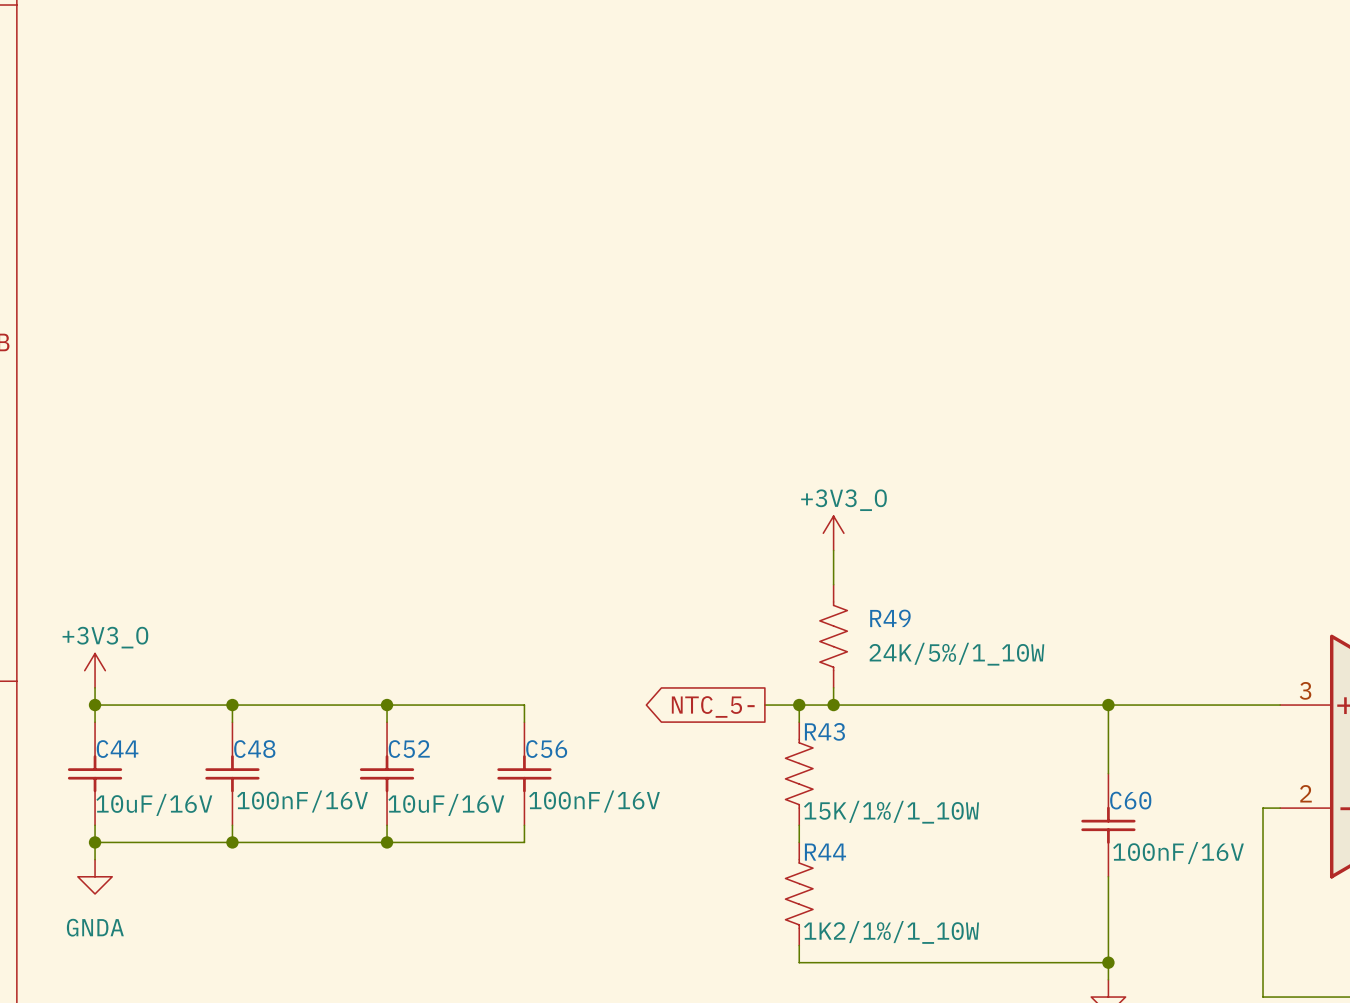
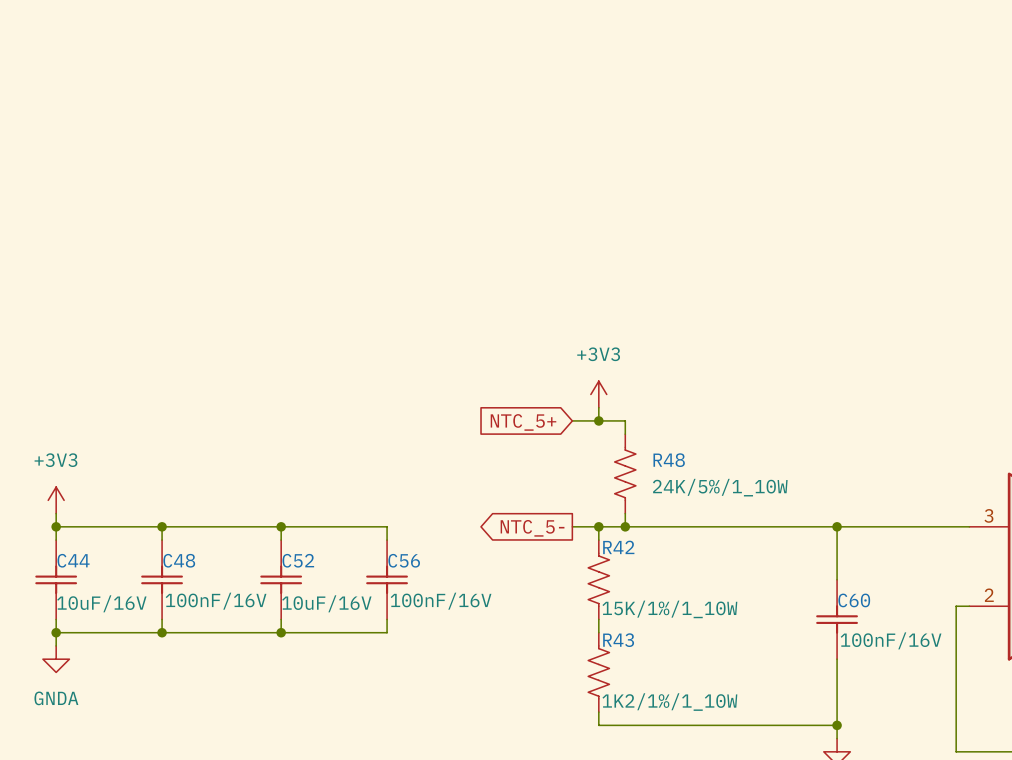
power symbol: none -> +3V3 (598, 394)
power symbol: +3V3_O (833, 533) -> none
wire: none -> (598, 407) (598, 420)
wire: (833, 550) (833, 567) -> (572, 420) (625, 420)
junction: none -> (598, 420)
global label: none -> NTC_5+ (523, 422)
R49 name: R49 (890, 618) -> R48 (669, 460)
power symbol: +3V3_O (95, 670) -> +3V3 (56, 500)
R43 name: R43 (824, 731) -> R42 (618, 547)
R44 name: R44 (825, 852) -> R43 (618, 640)

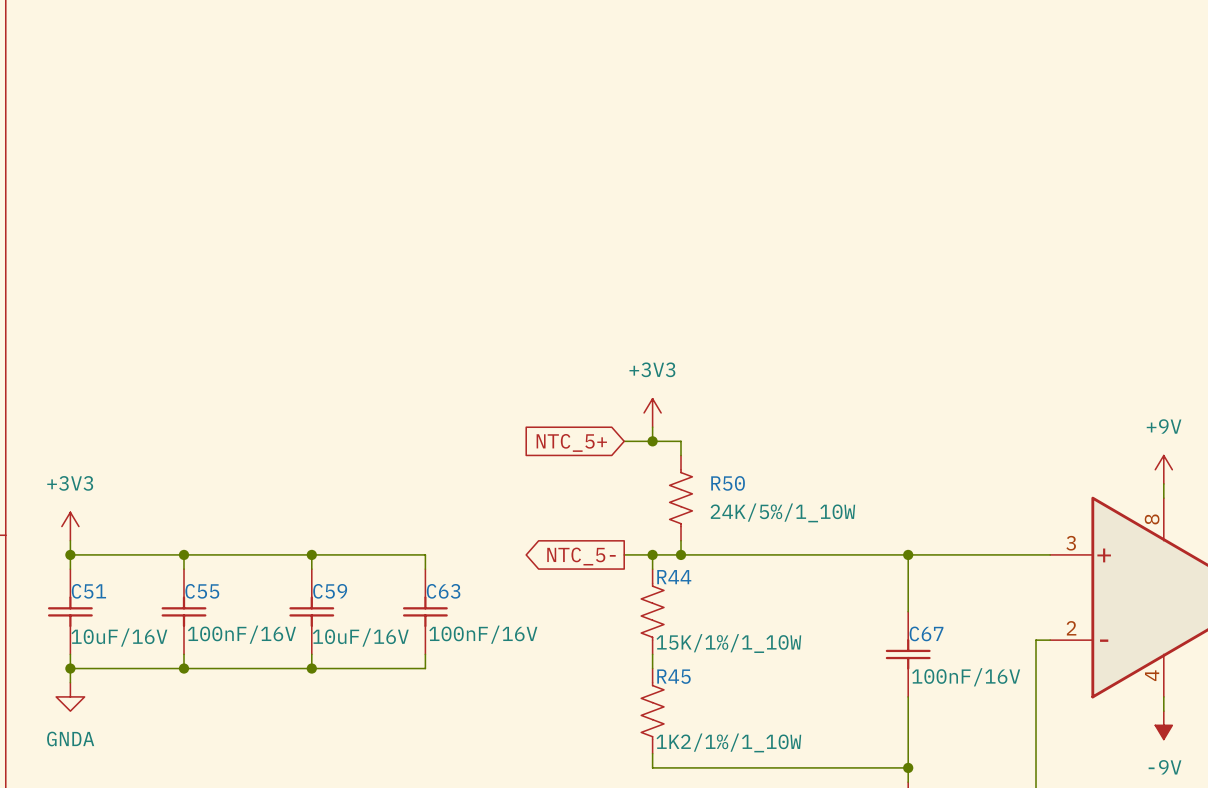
R48 name: R48 (669, 460) -> R50 (728, 483)
R42 name: R42 (618, 547) -> R44 (674, 577)
C44 name: C44 (73, 560) -> C51 (88, 591)
C48 name: C48 (179, 560) -> C55 (202, 591)
C52 name: C52 (298, 560) -> C59 (330, 591)
C56 name: C56 (404, 560) -> C63 (443, 591)
C60 name: C60 (854, 600) -> C67 (926, 633)
R43 name: R43 (618, 640) -> R45 (673, 676)

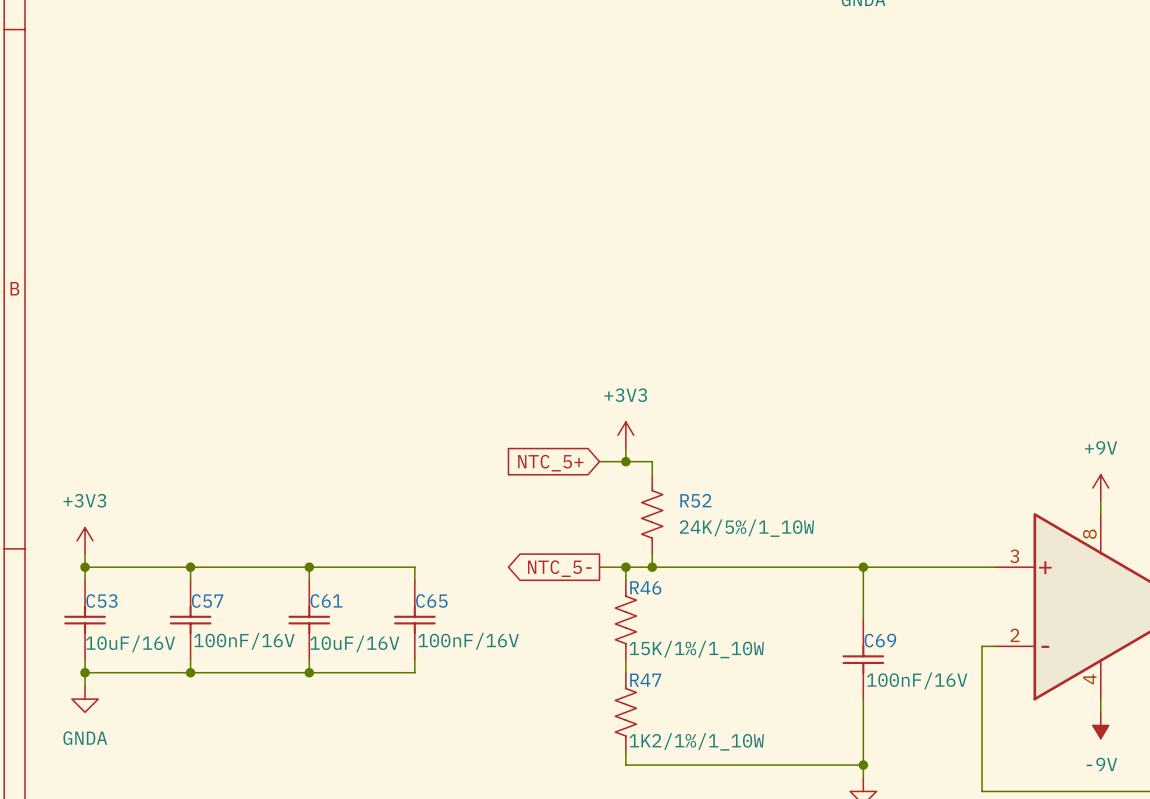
R50 name: R50 (728, 483) -> R52 (695, 500)
R44 name: R44 (674, 577) -> R46 (645, 587)
C51 name: C51 (88, 591) -> C53 (101, 601)
C55 name: C55 (202, 591) -> C57 (207, 601)
C59 name: C59 (330, 591) -> C61 (326, 601)
C63 name: C63 (443, 591) -> C65 (431, 601)
C67 name: C67 (926, 633) -> C69 (880, 640)
R45 name: R45 (673, 676) -> R47 (645, 680)

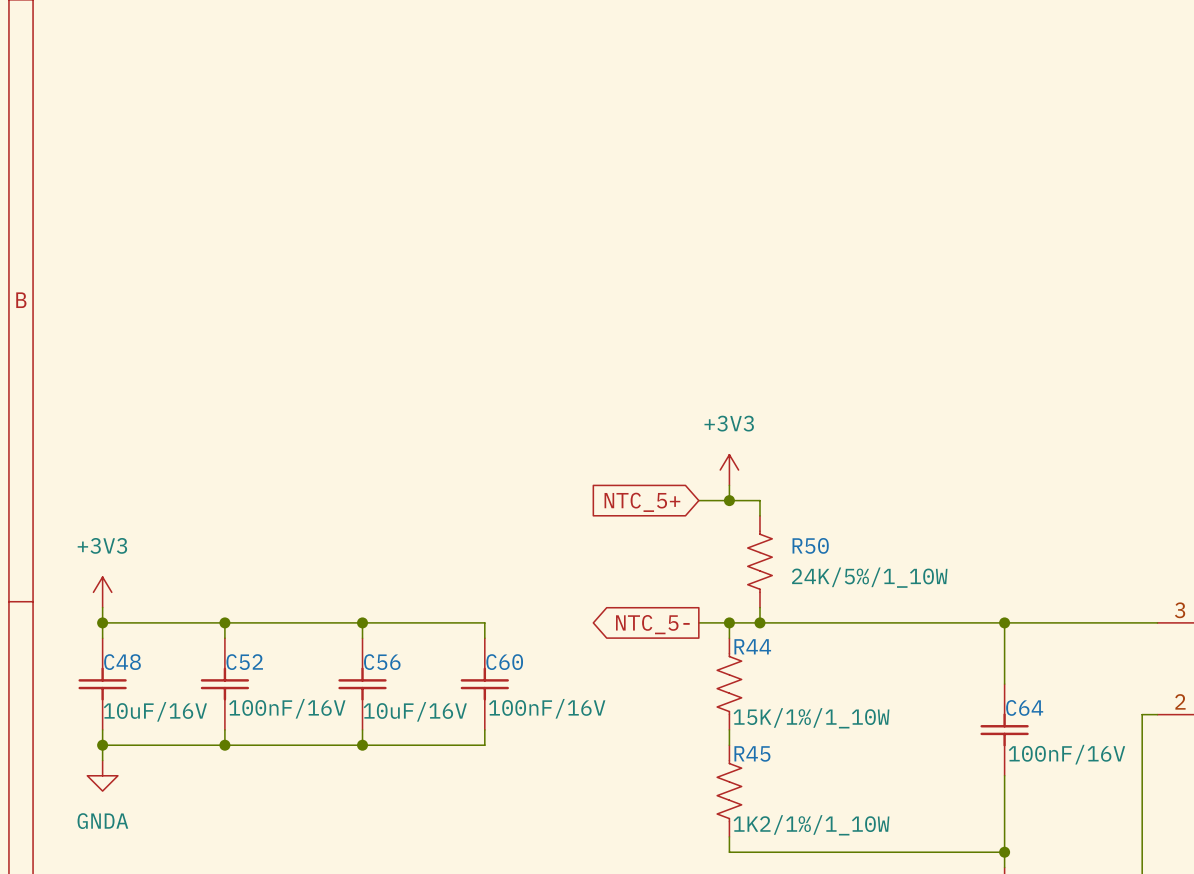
R52 name: R52 (695, 500) -> R50 (810, 545)
R46 name: R46 (645, 587) -> R44 (752, 646)
C53 name: C53 (101, 601) -> C48 (122, 662)
C57 name: C57 (207, 601) -> C52 (244, 662)
C61 name: C61 (326, 601) -> C56 (382, 662)
C65 name: C65 (431, 601) -> C60 (504, 662)
C69 name: C69 (880, 640) -> C64 (1024, 707)
R47 name: R47 (645, 680) -> R45 (752, 753)

